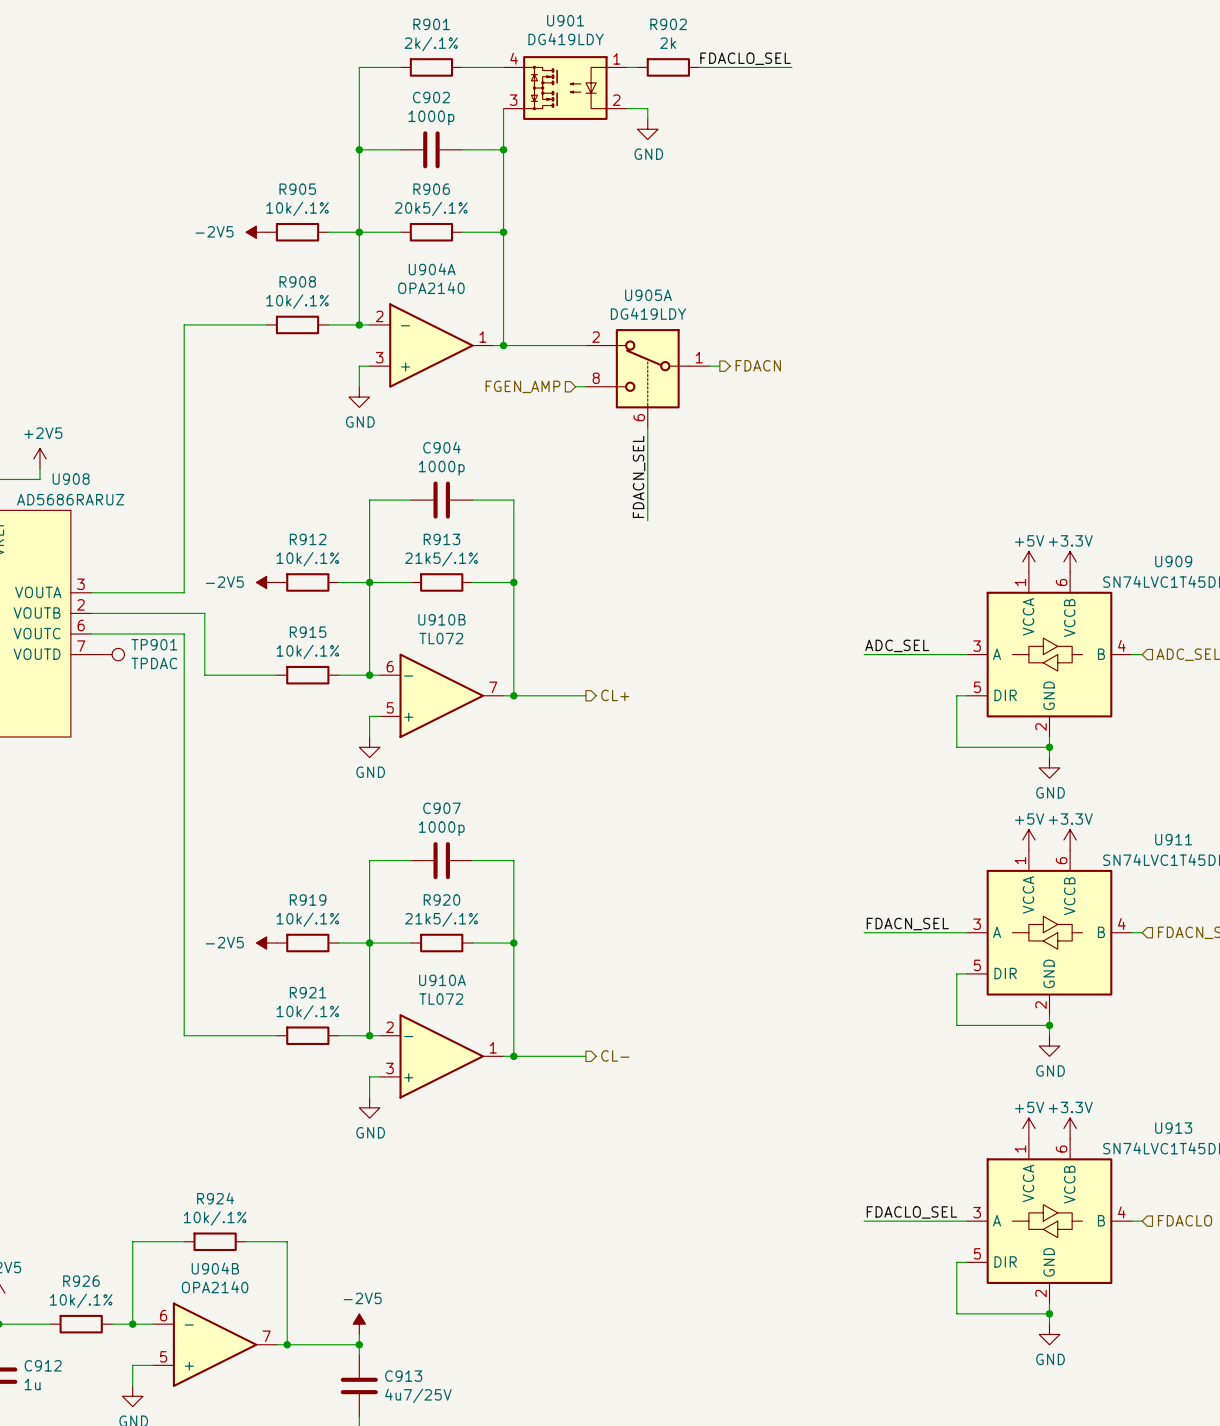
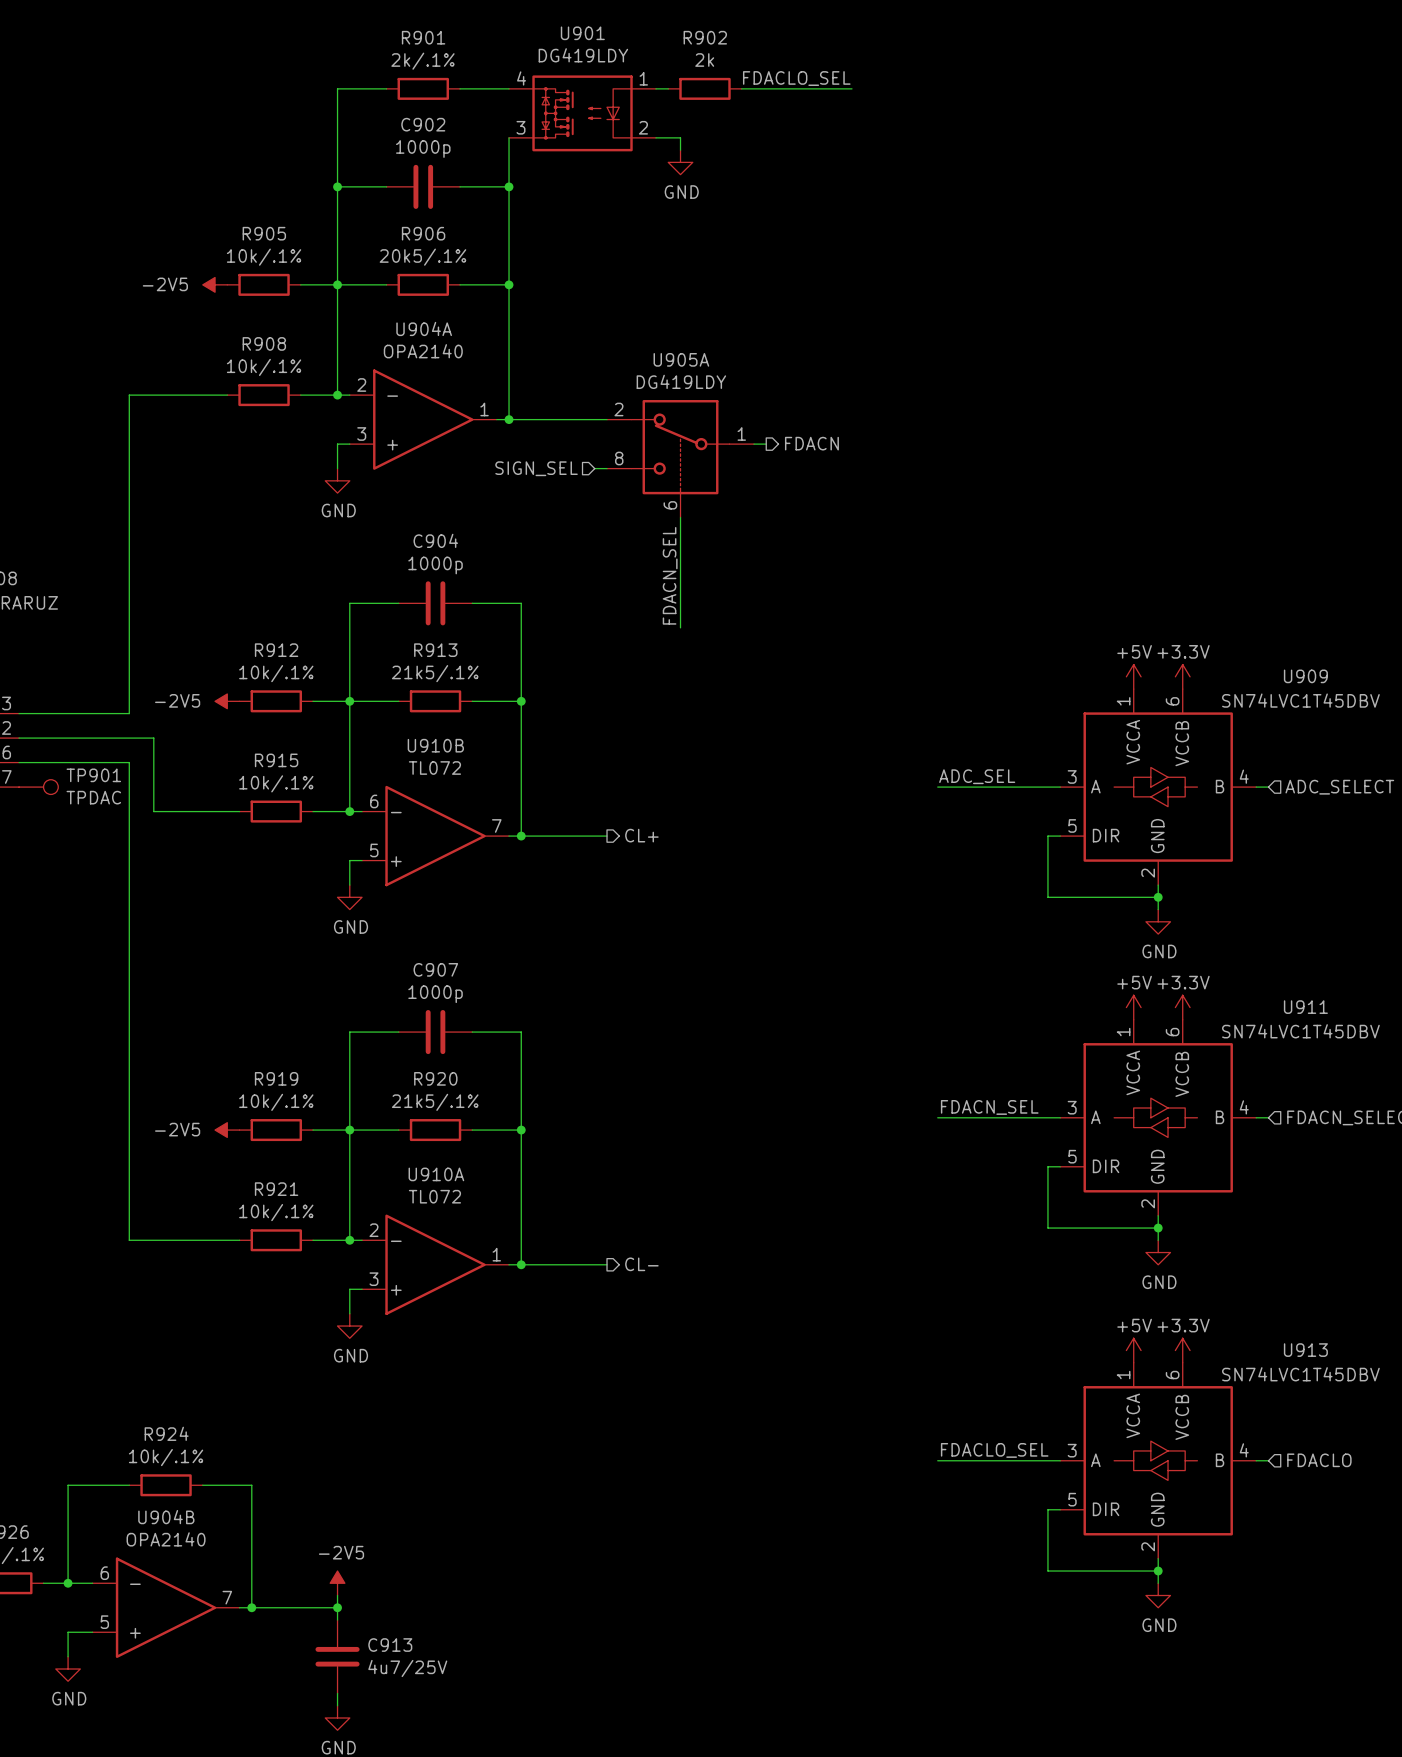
hierarchical label: FGEN_AMP (522, 386) -> SIGN_SEL (536, 468)

